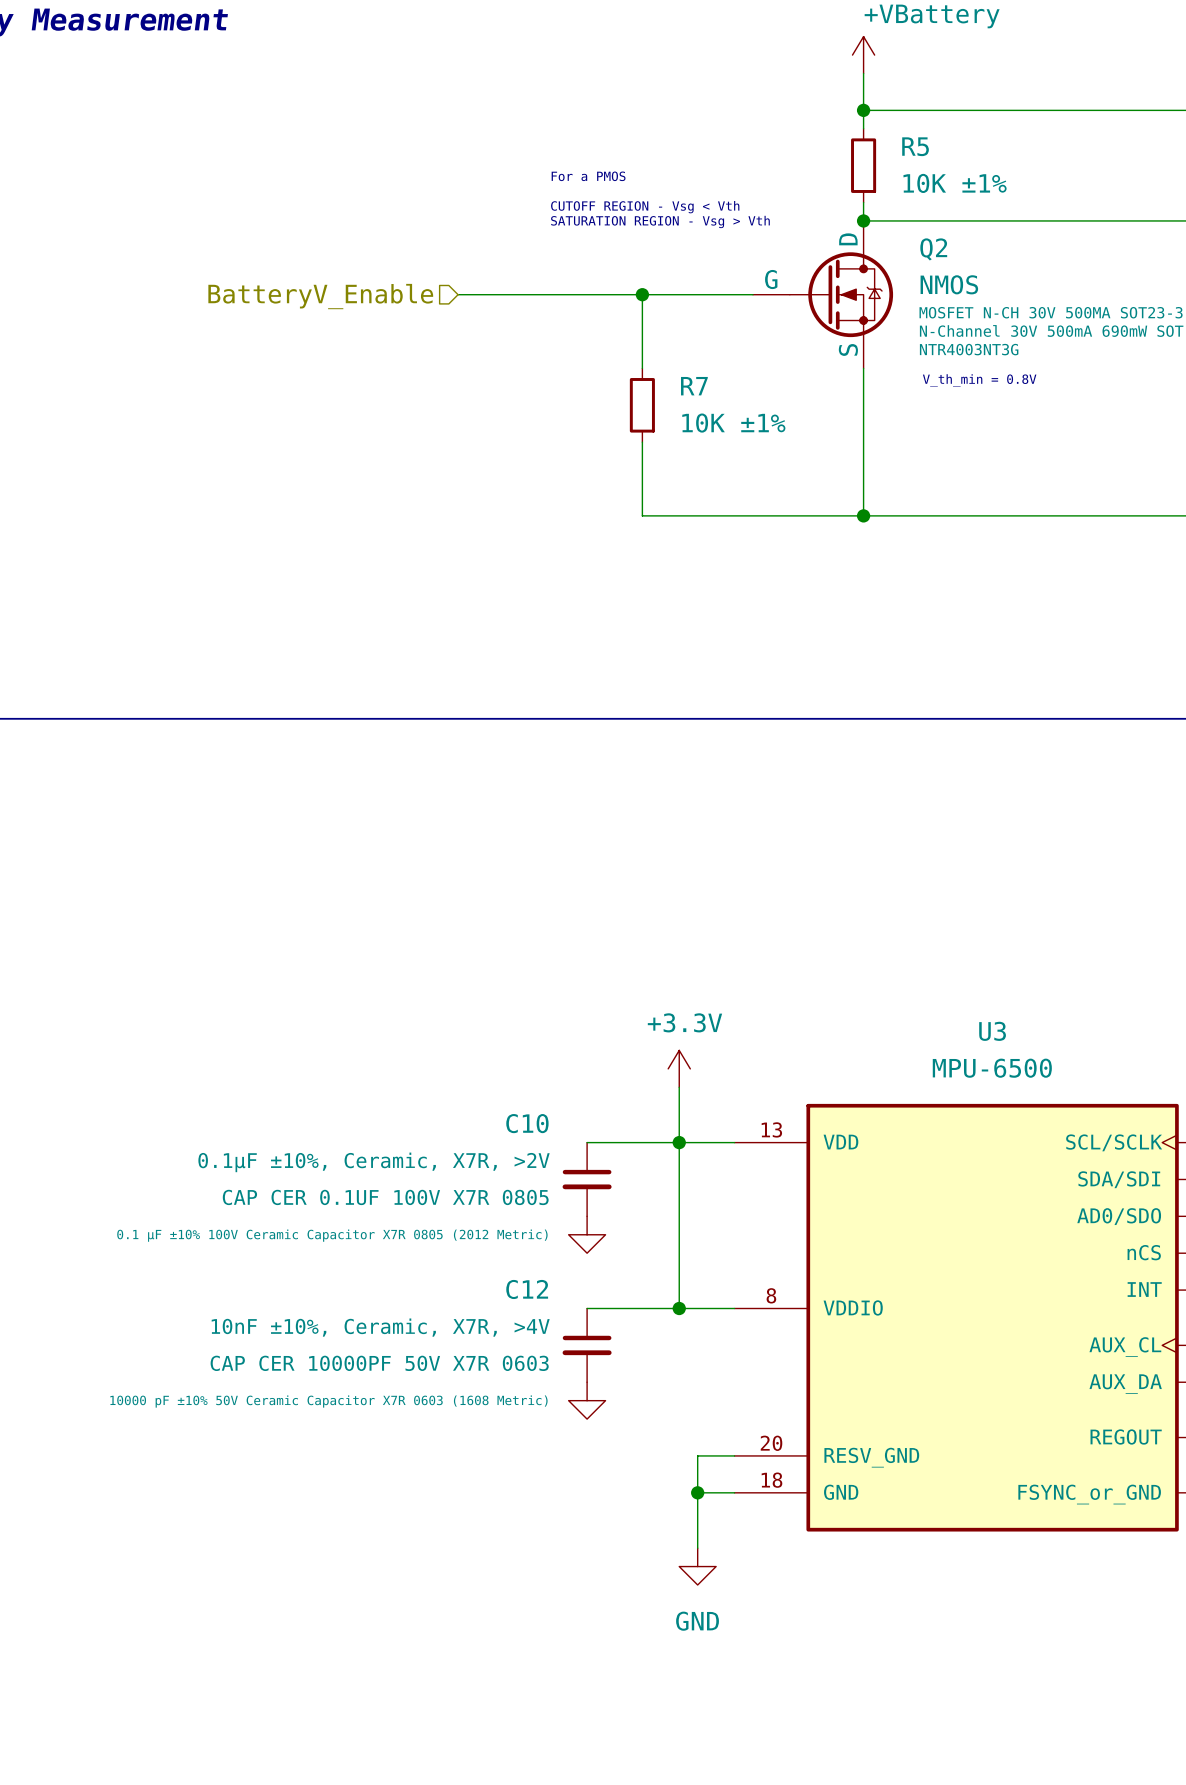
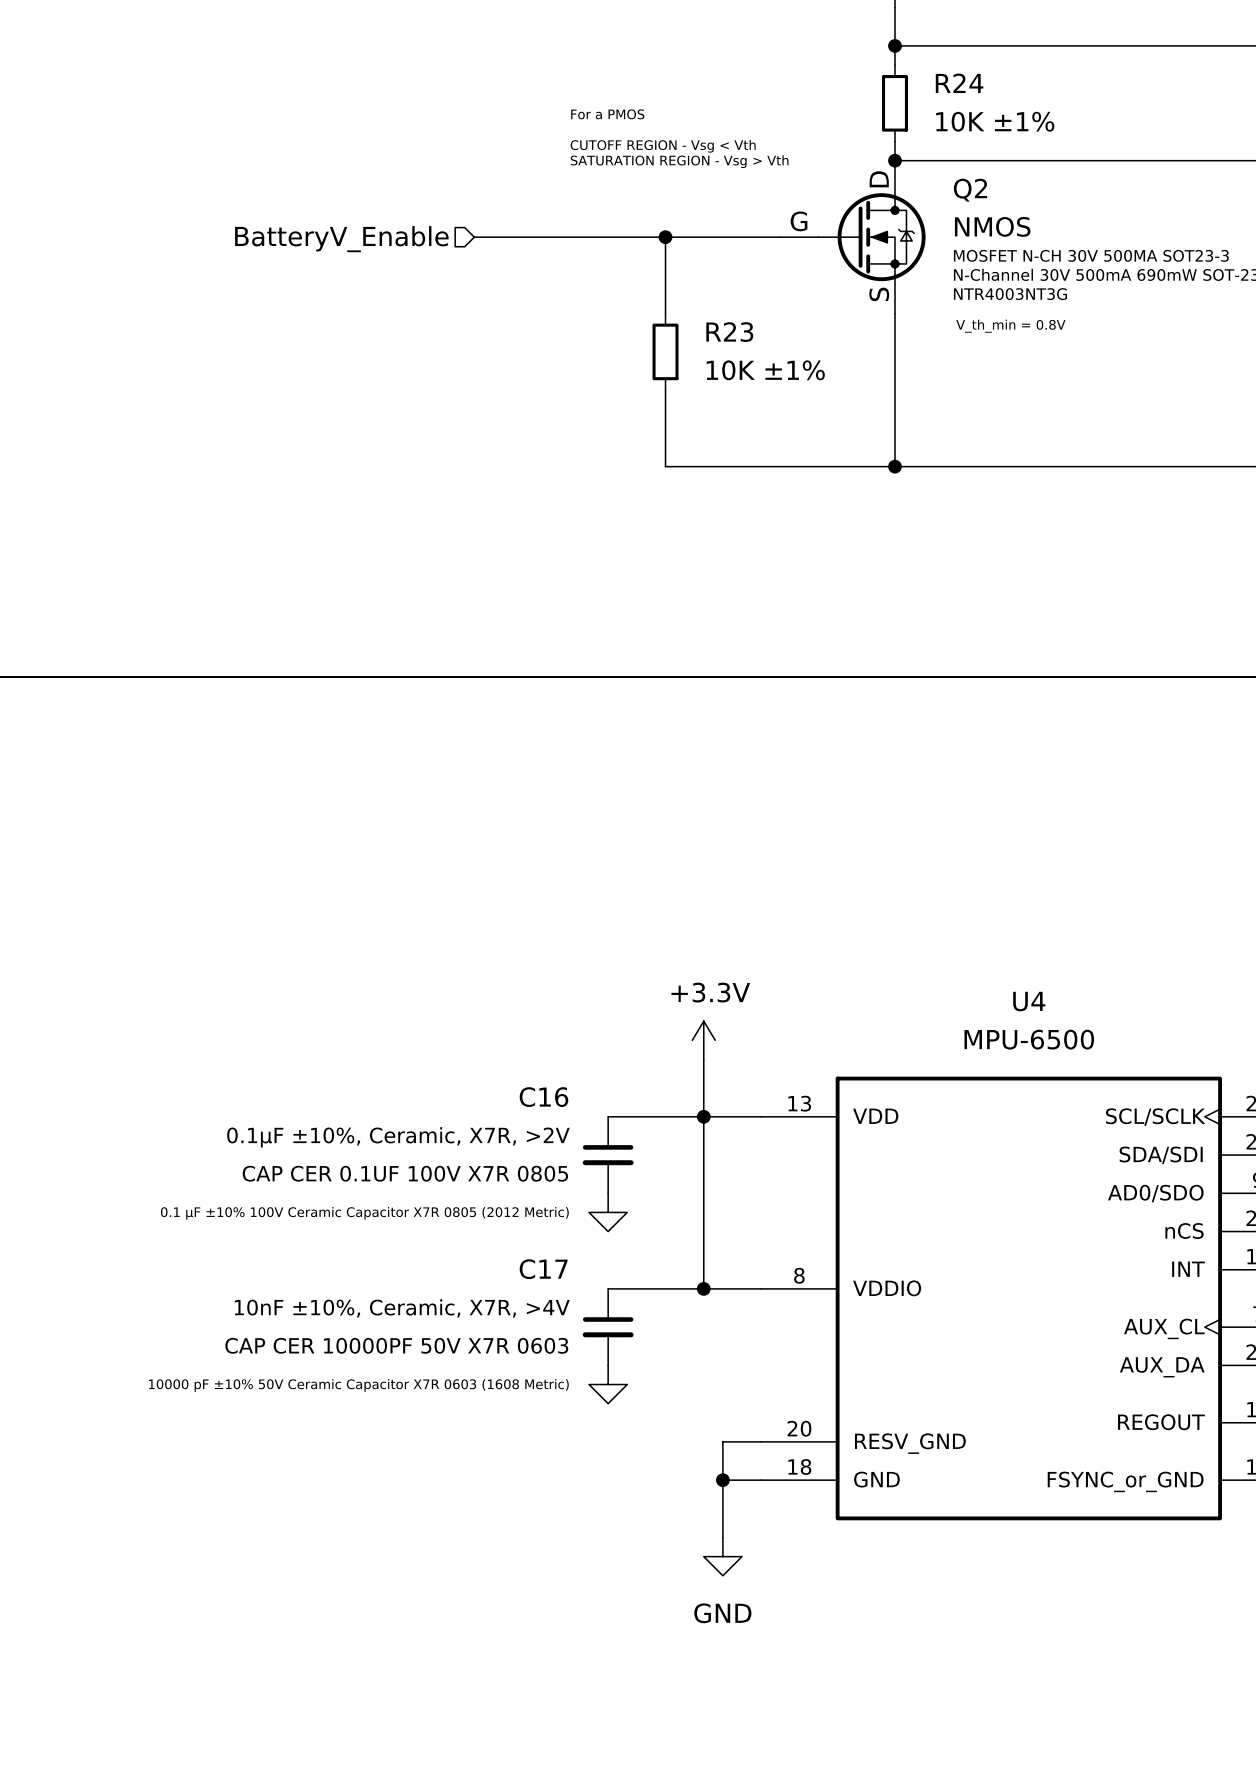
R5 name: R5 (915, 146) -> R24 (959, 83)
R7 name: R7 (694, 386) -> R23 (729, 332)
U3 name: U3 (992, 1031) -> U4 (1029, 1001)
C10 name: C10 (527, 1123) -> C16 (543, 1097)
C12 name: C12 (527, 1289) -> C17 (543, 1269)

